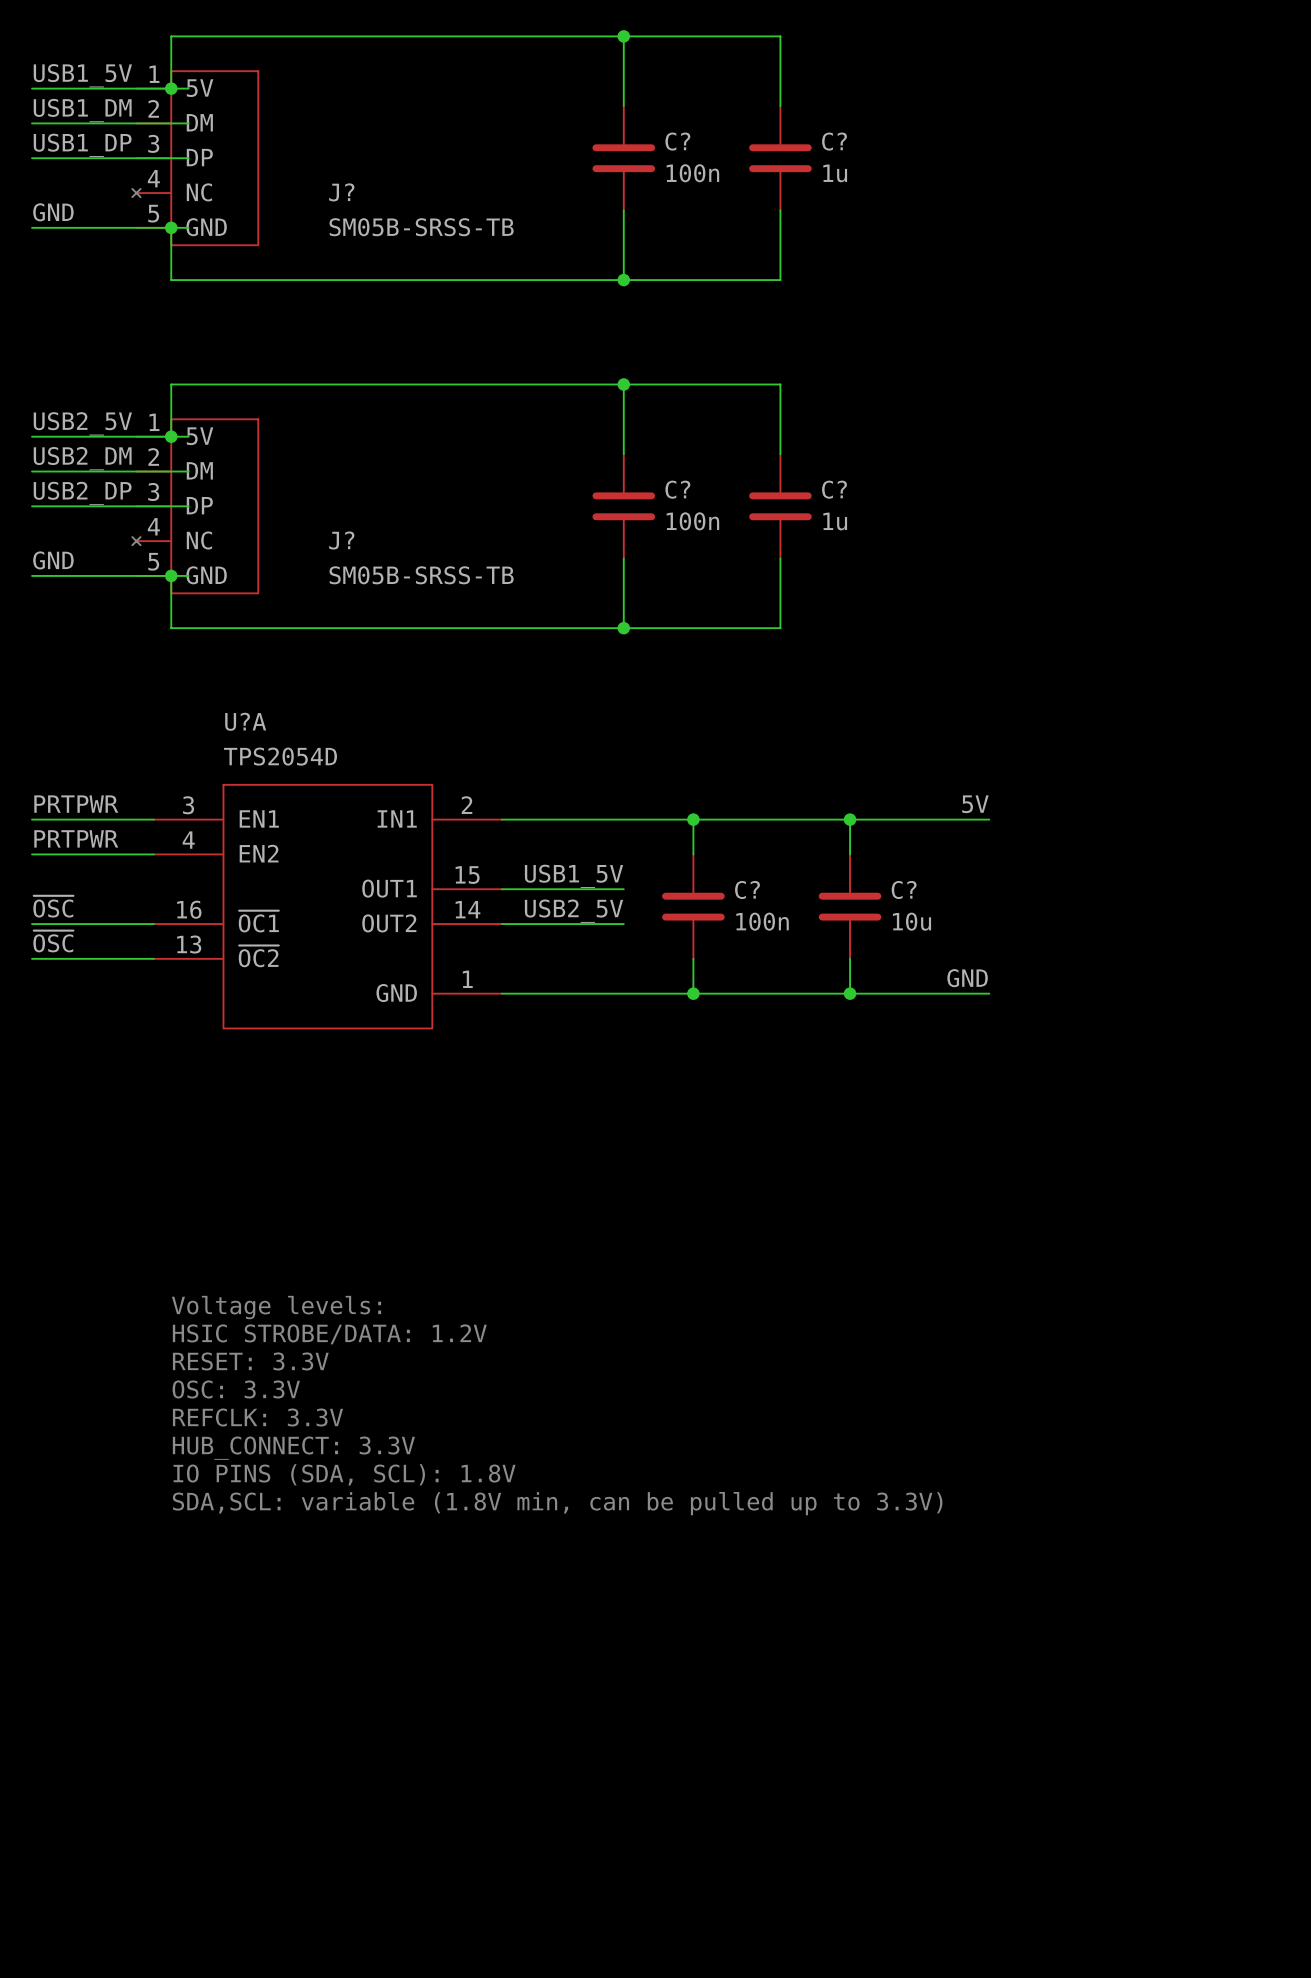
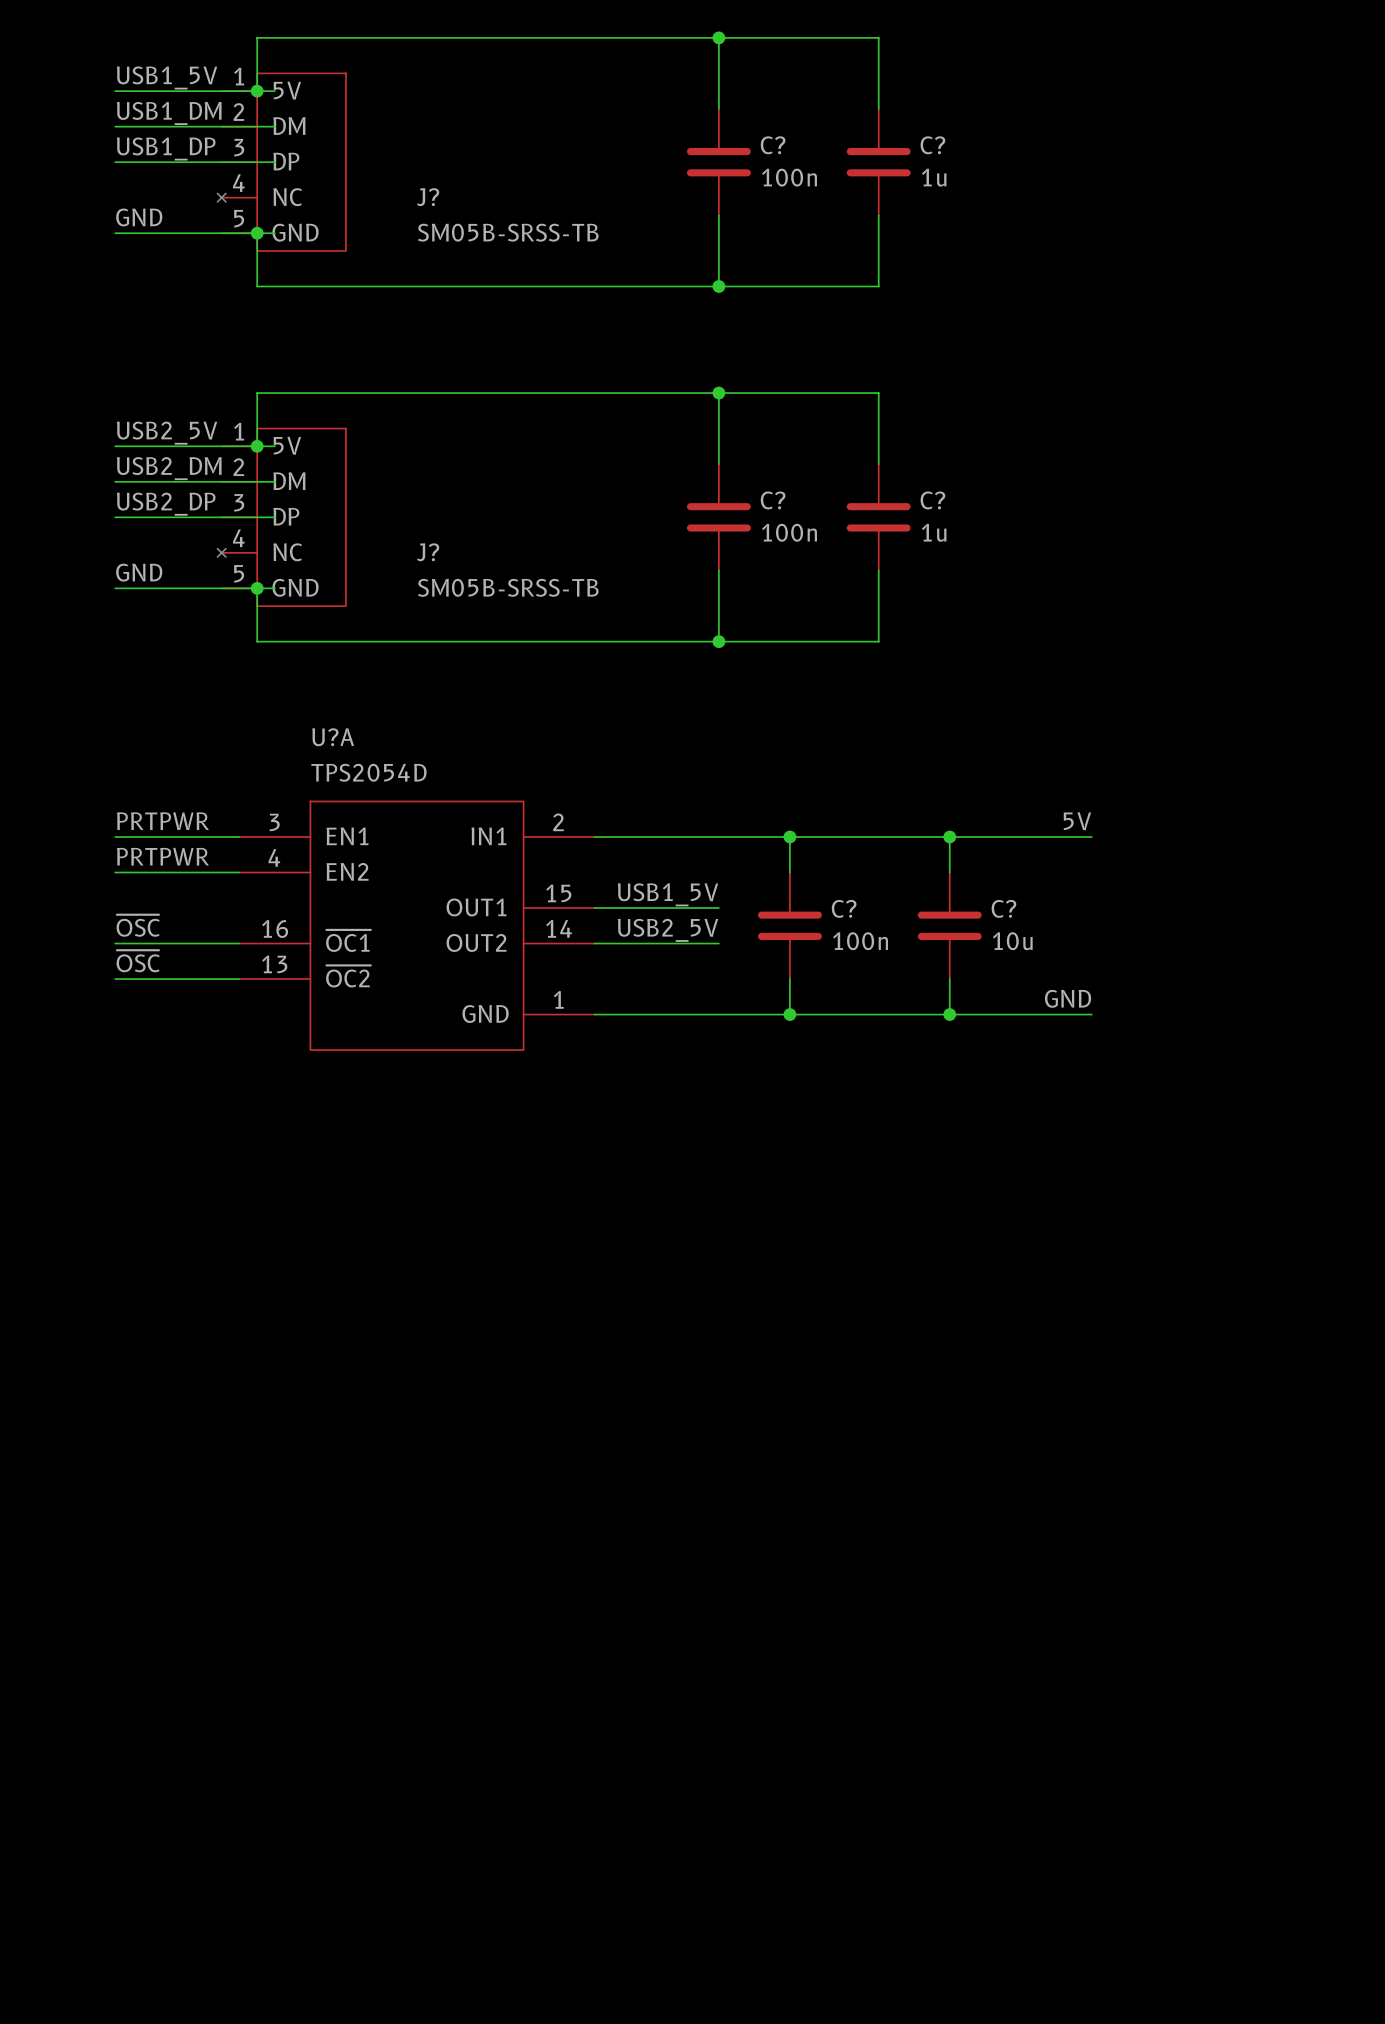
text: Voltage levels: (276, 1307) -> none
text: HSIC STROBE/DATA: 1.2V (329, 1334) -> none
text: RESET: 3.3V (250, 1361) -> none
text: OSC: 3.3V (236, 1389) -> none
text: REFCLK: 3.3V (257, 1417) -> none
text: HUB_CONNECT: 3.3V (293, 1448) -> none
text: IO PINS (SDA, SCL): 1.8V (344, 1474) -> none
text: SDA,SCL: variable (1.8V min, can be pulled up to 3.3V) (557, 1503) -> none

